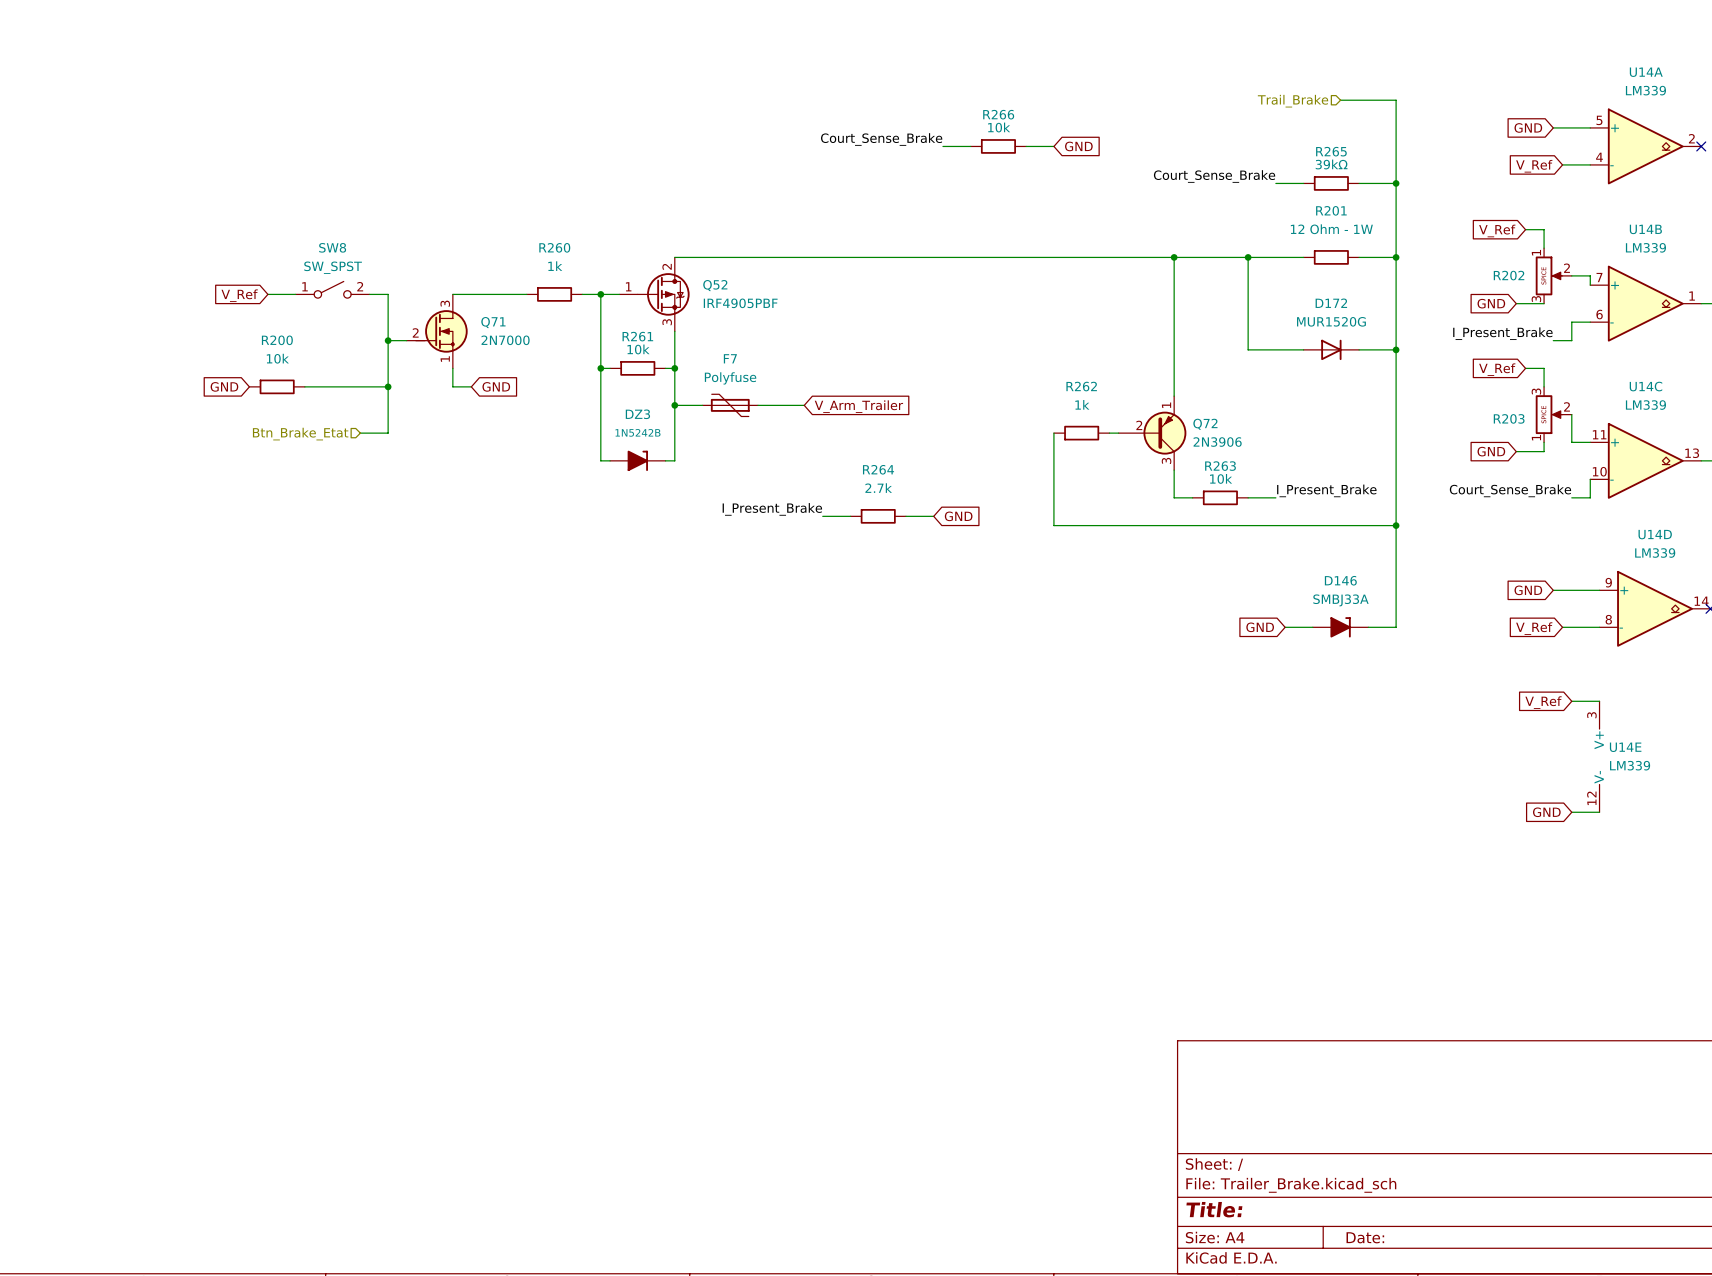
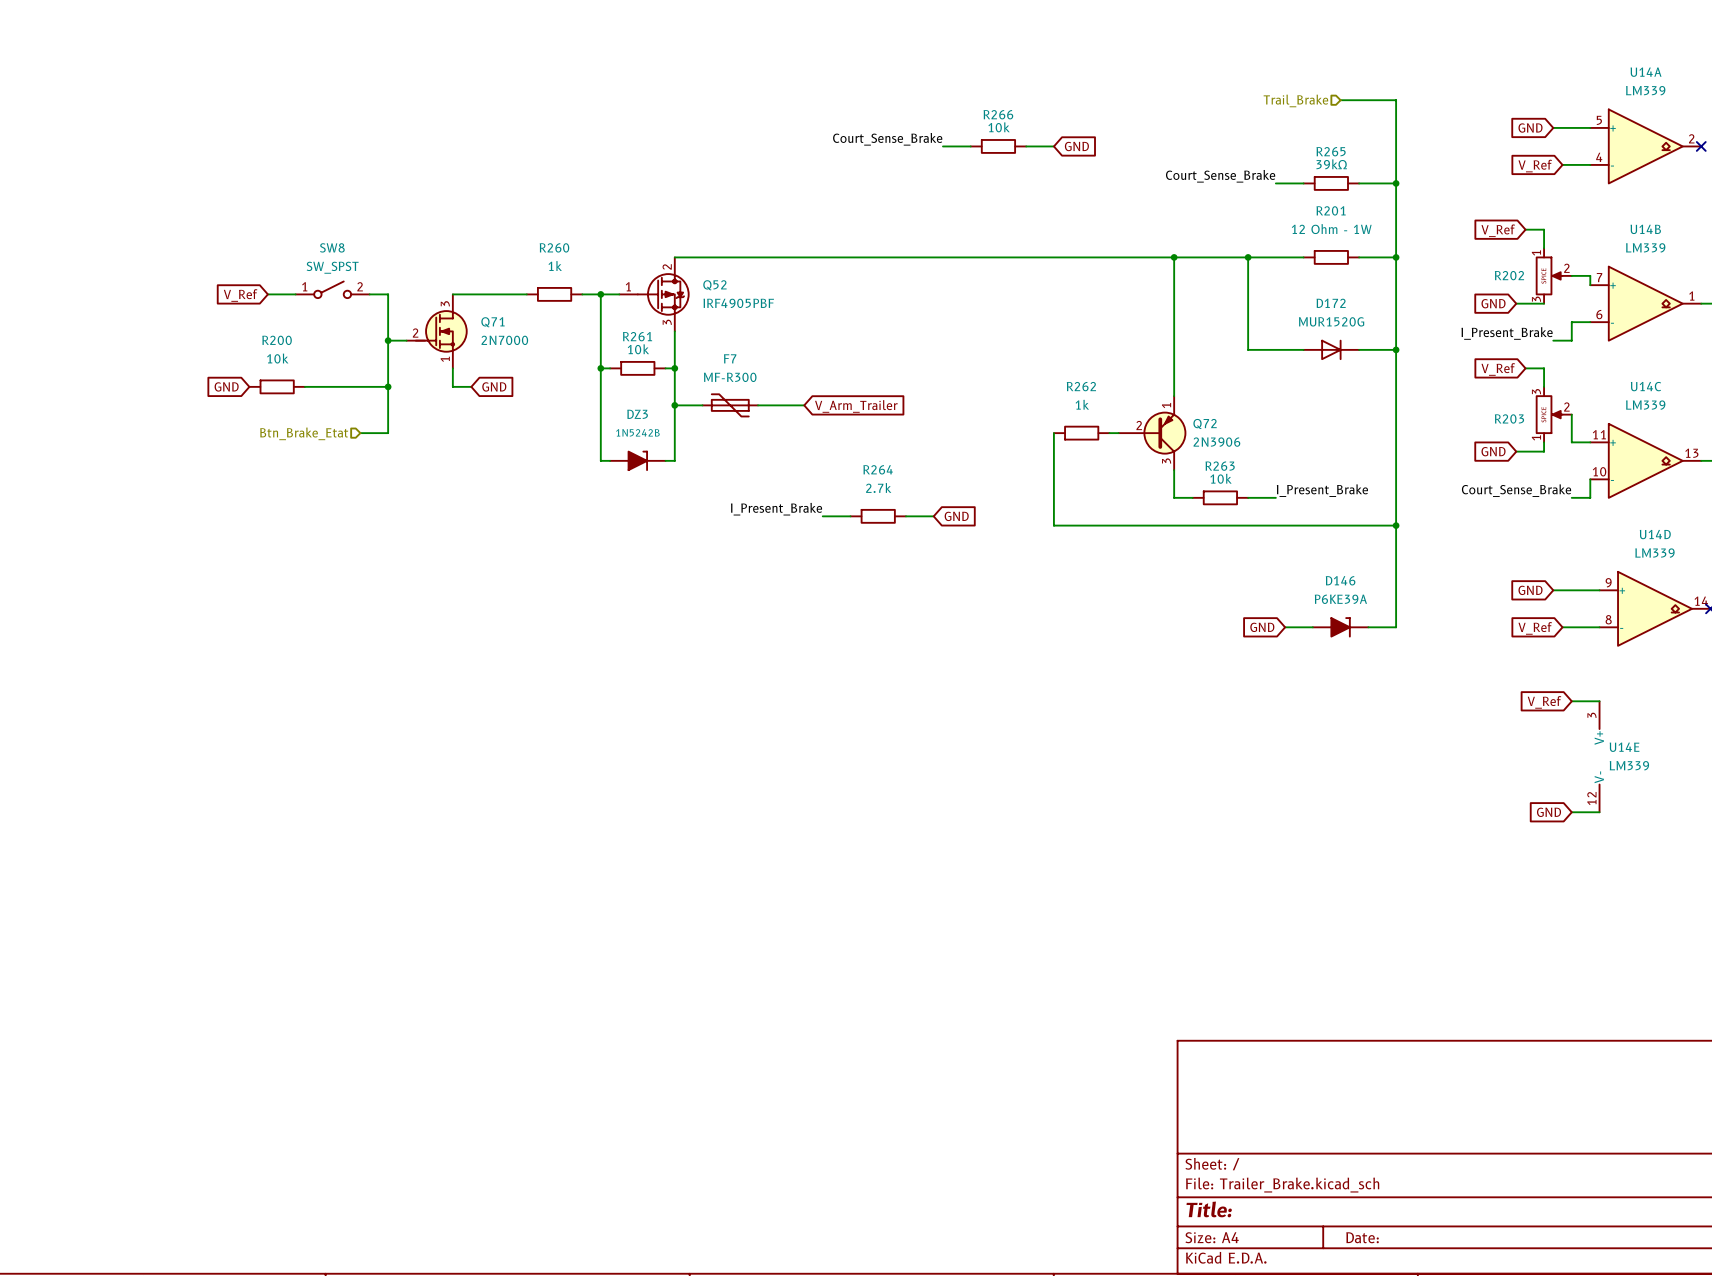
F7 value: Polyfuse (730, 378) -> MF-R300 (730, 377)
D146 value: SMBJ33A (1340, 600) -> P6KE39A (1340, 599)

